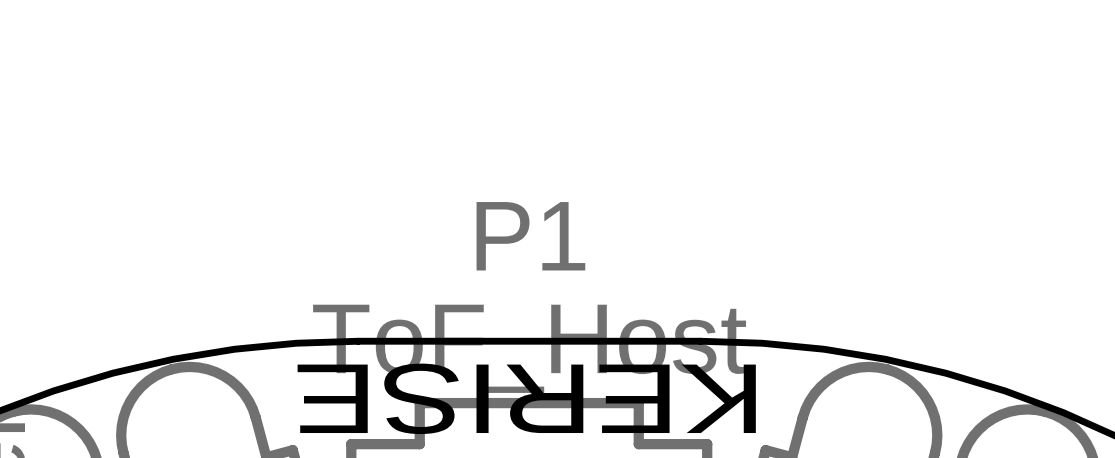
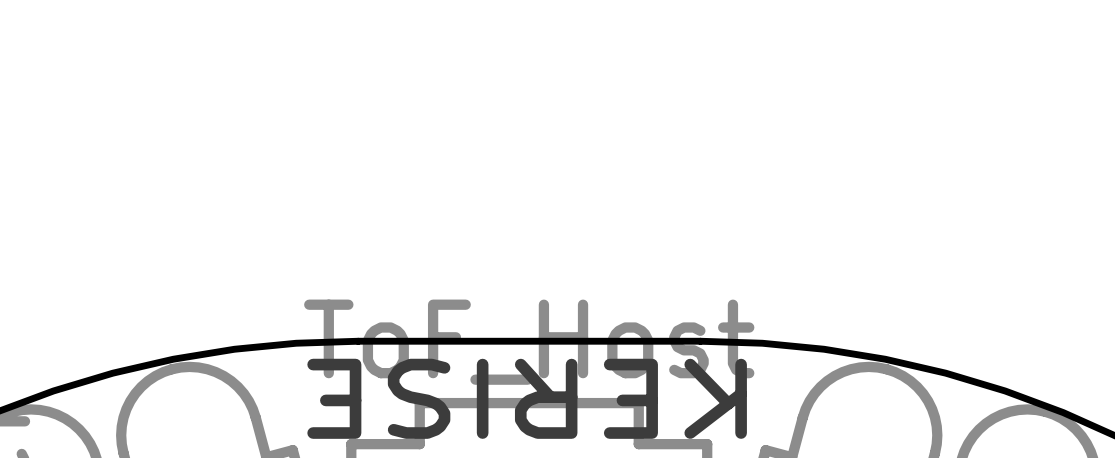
P1 name: P1 (530, 236) -> none

